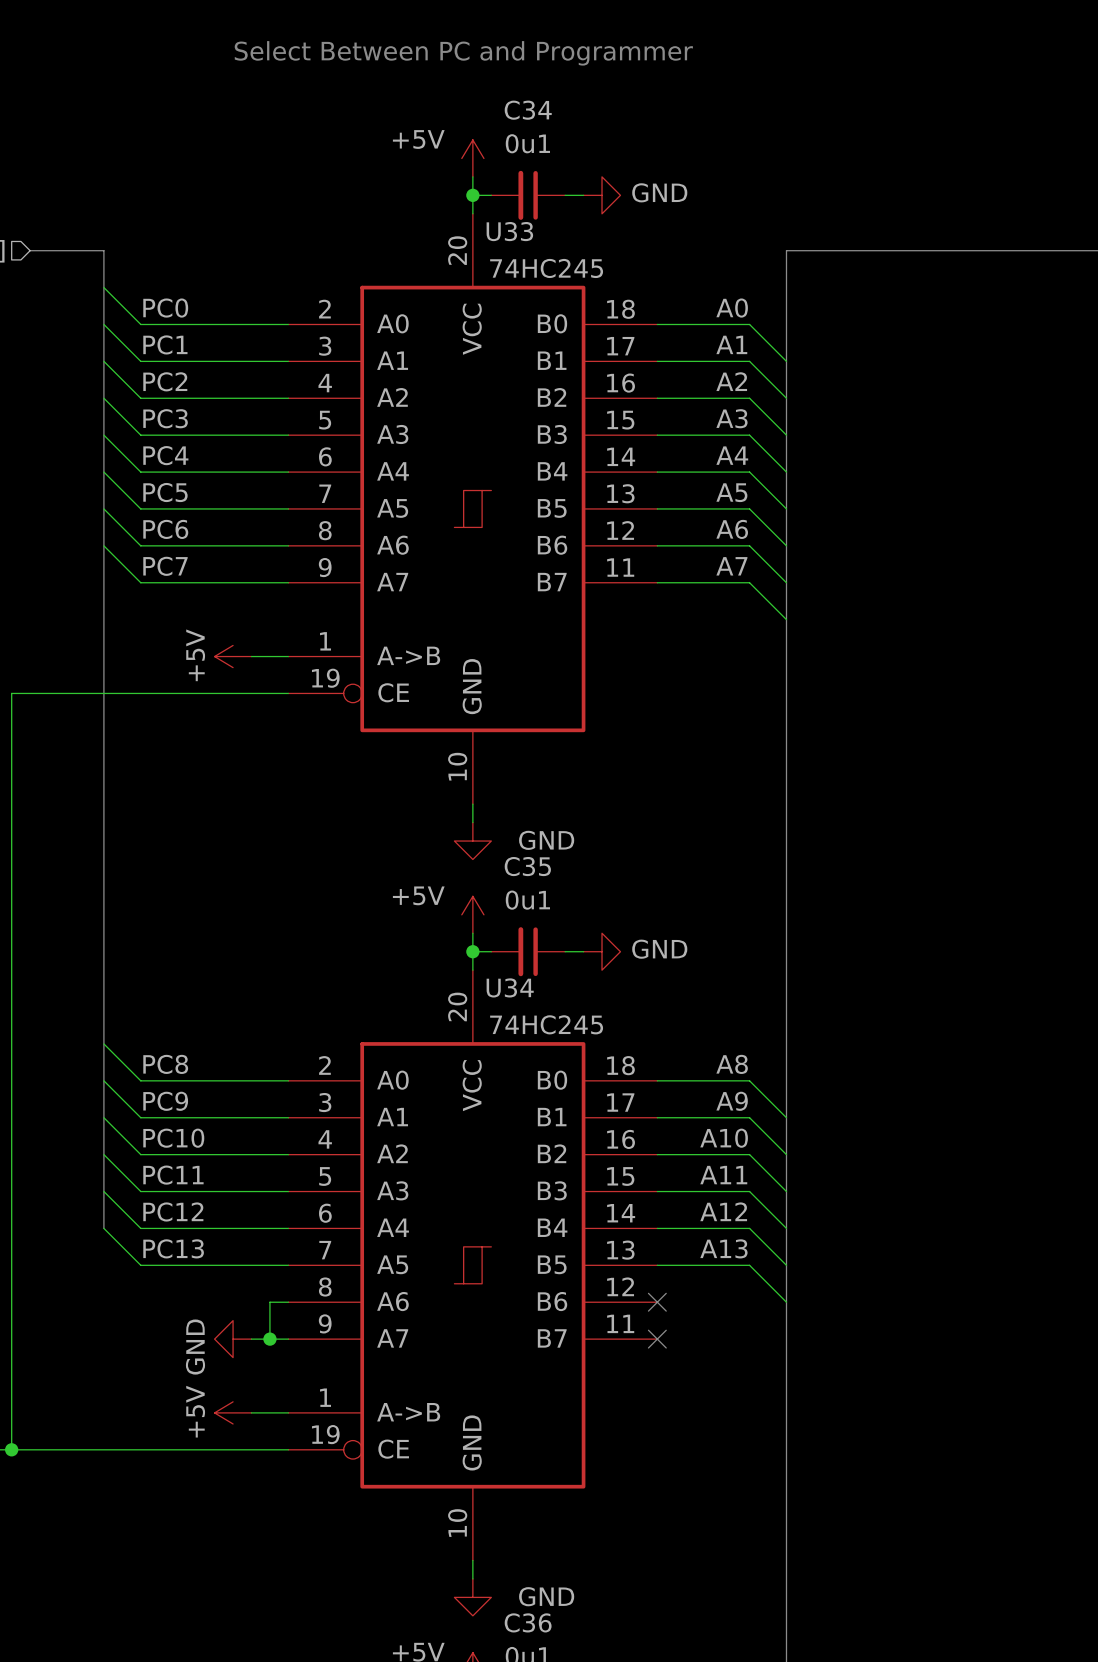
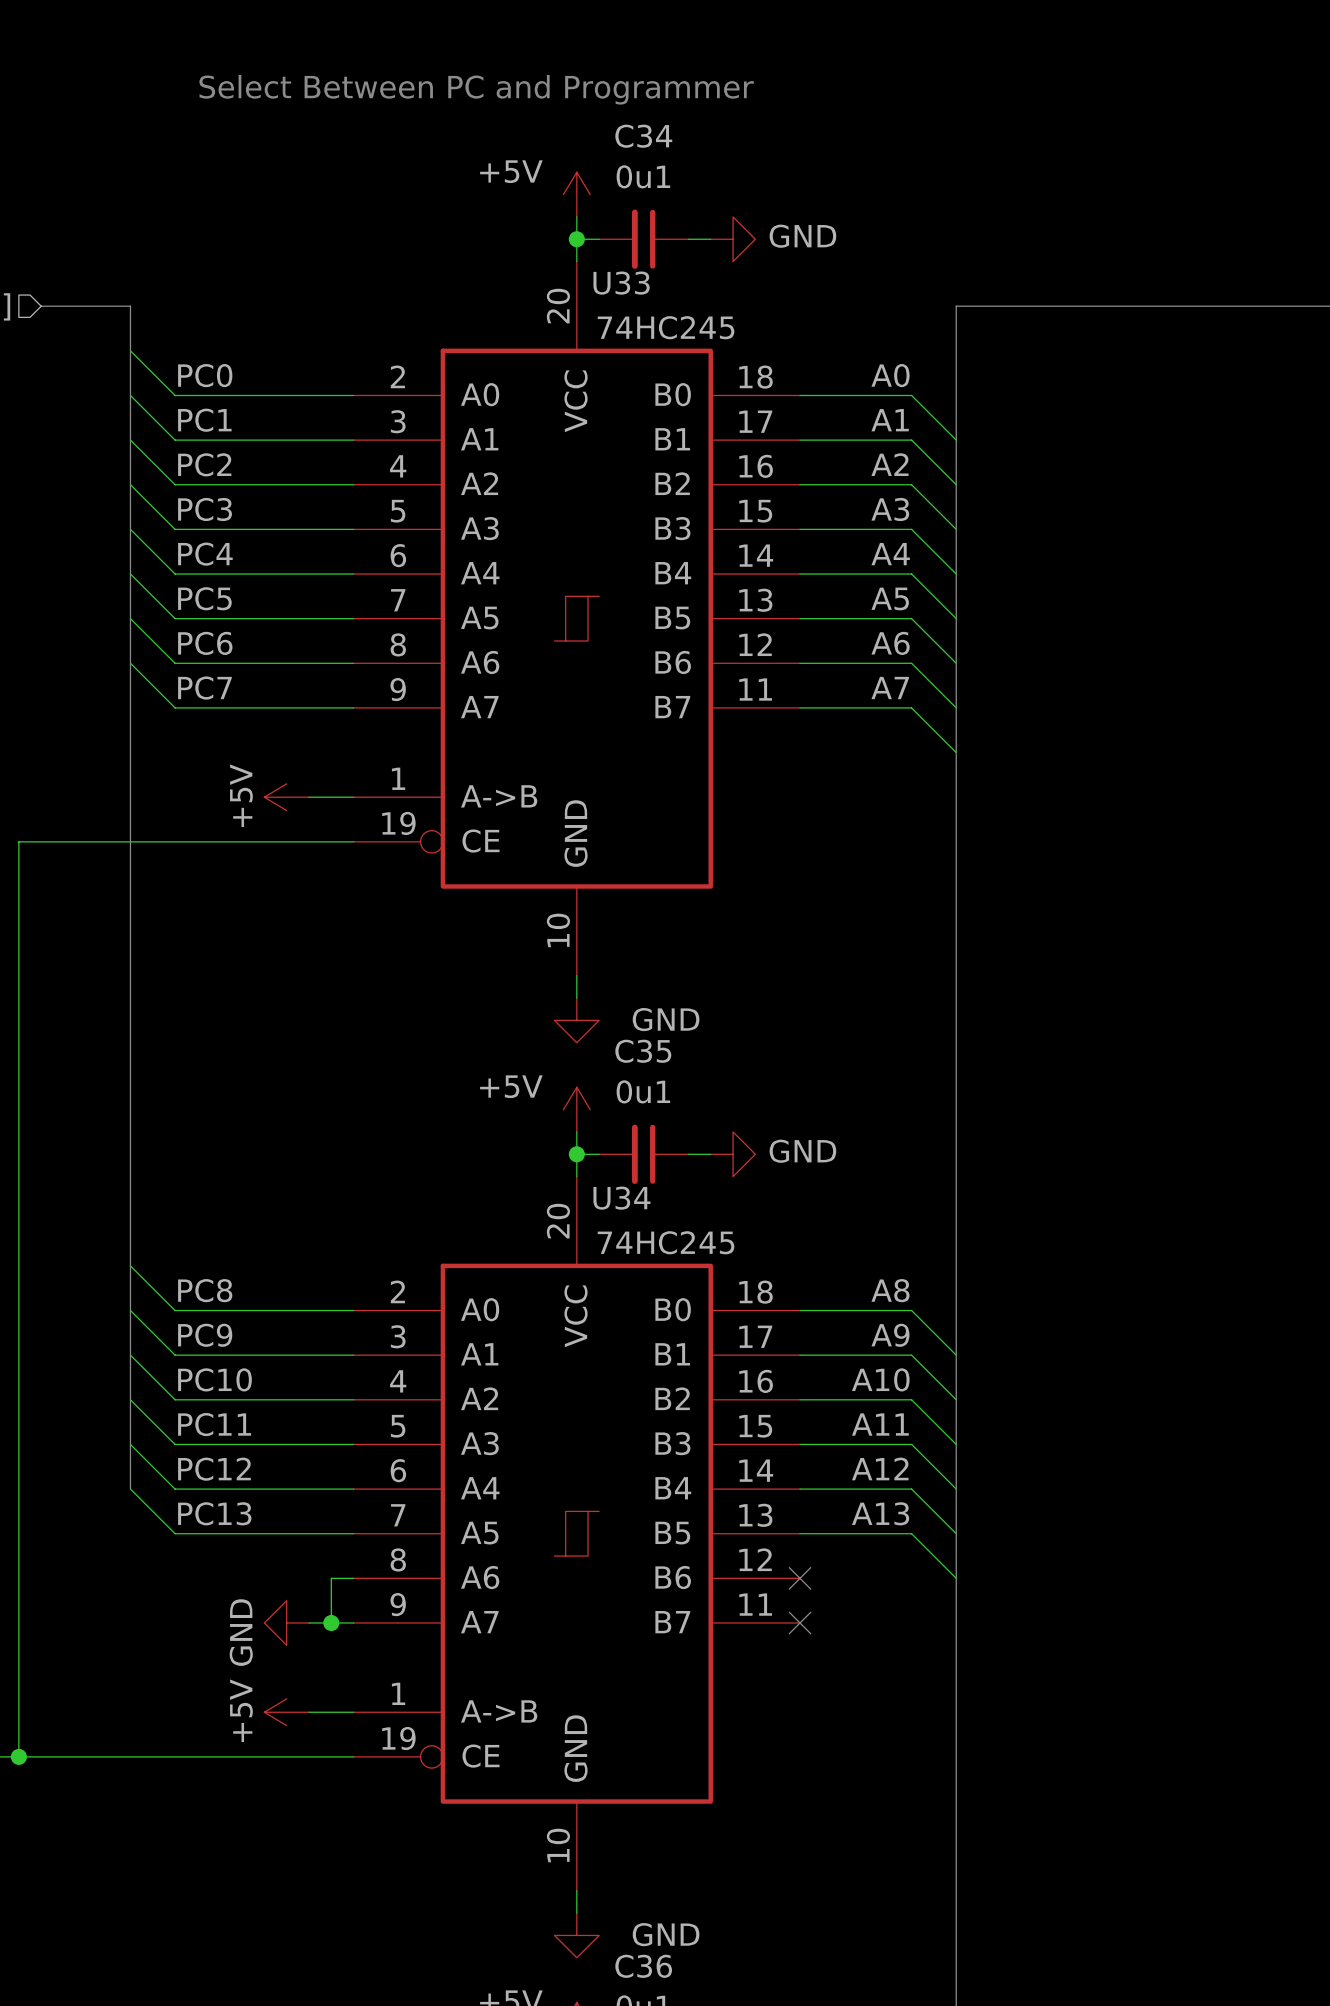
text position: Select Between PC and Programmer (463, 53) -> Select Between PC and Programmer (476, 89)

